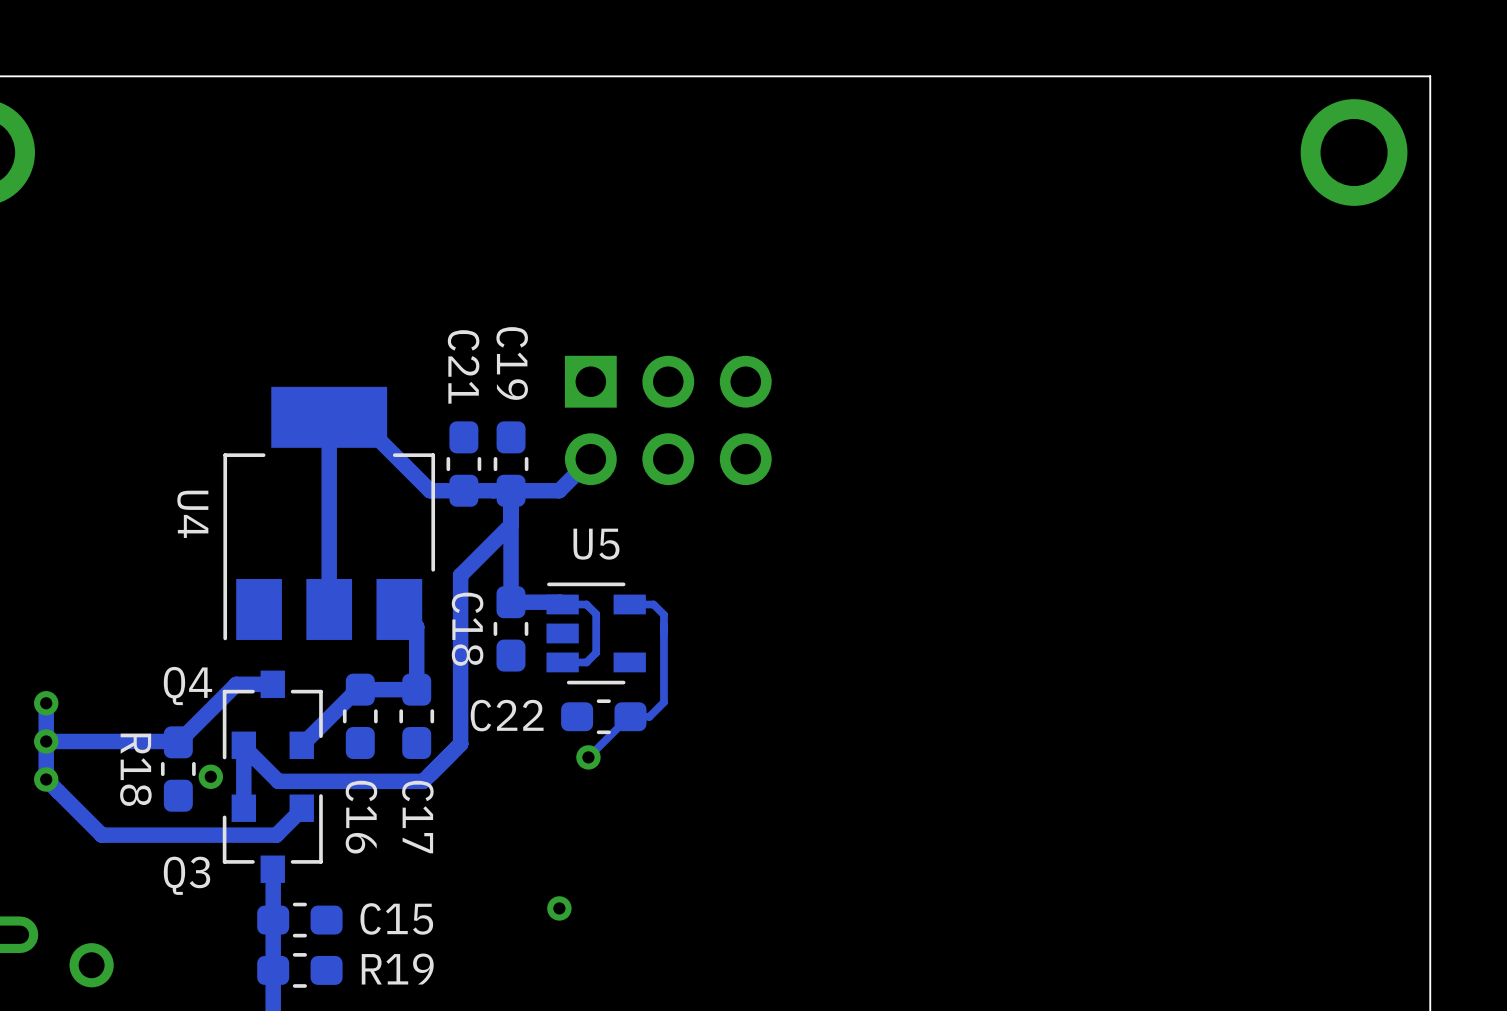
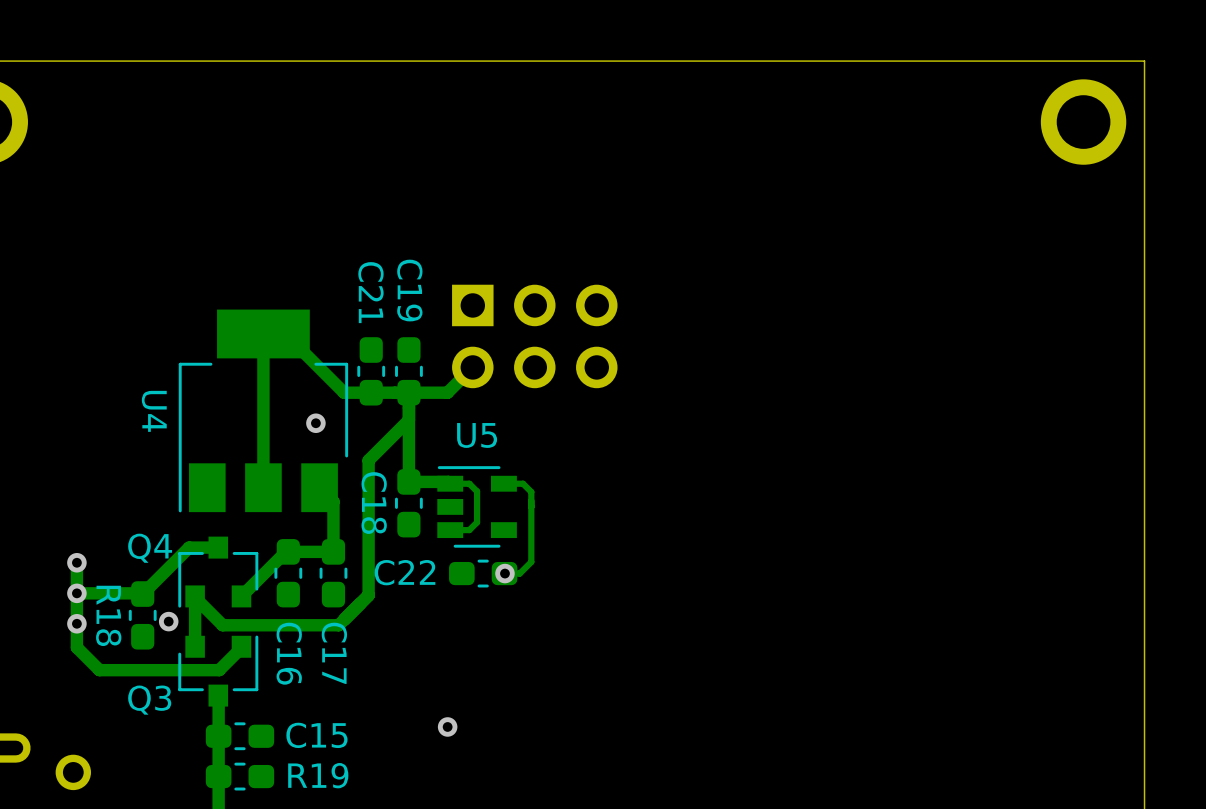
via: none -> (315, 423)
track: (46, 703) (46, 779) (101, 835) (276, 835) -> (76, 562) (76, 647) (99, 670) (219, 670) (221, 668)
via: (46, 703) -> none
via: none -> (76, 562)
track: (630, 716) (588, 757) -> none
via: (46, 741) -> none
track: (96, 741) (46, 741) -> none
via: none -> (76, 593)
via position: (588, 757) -> (504, 573)
via: (46, 779) -> none
via: none -> (76, 623)

